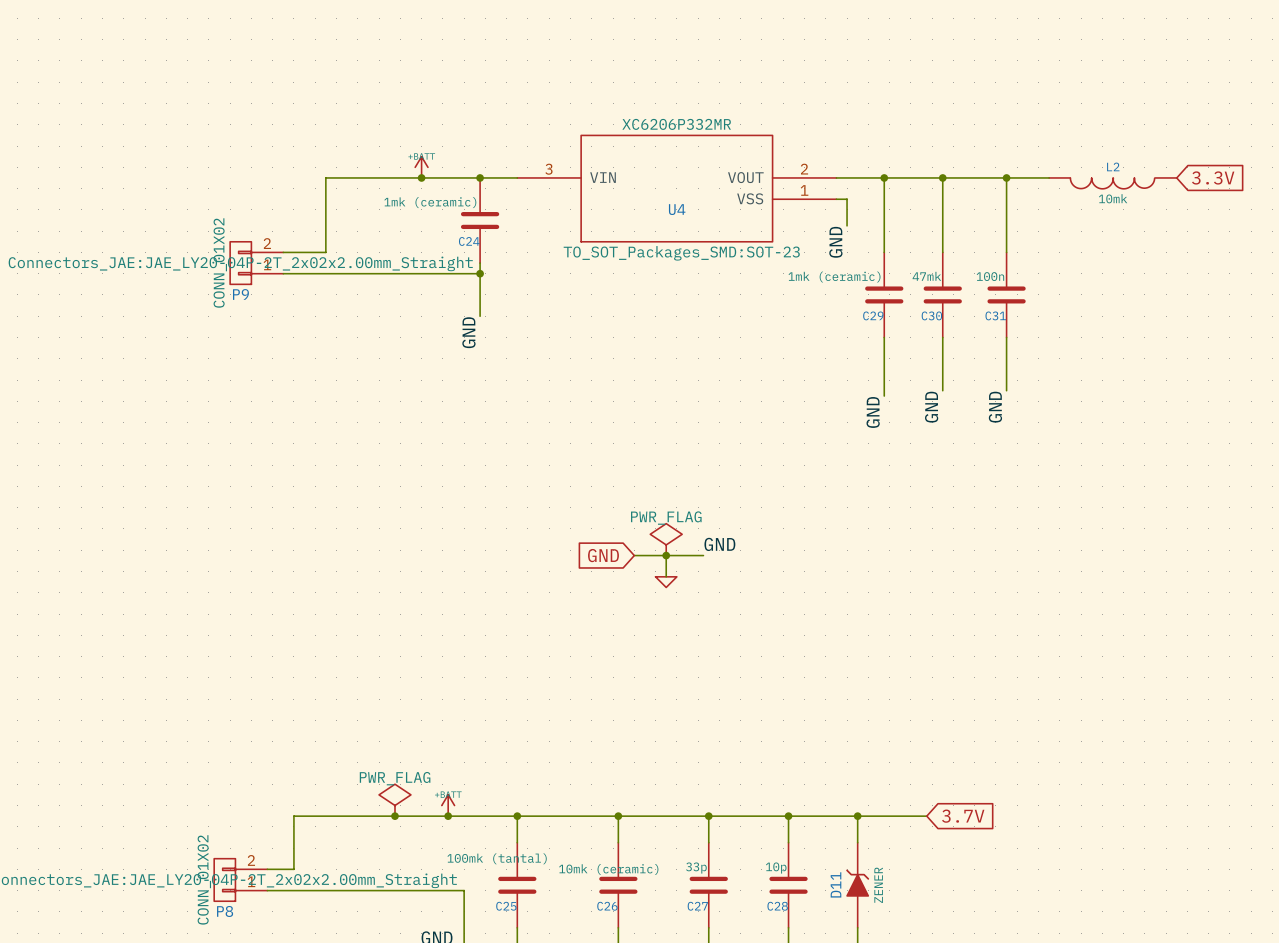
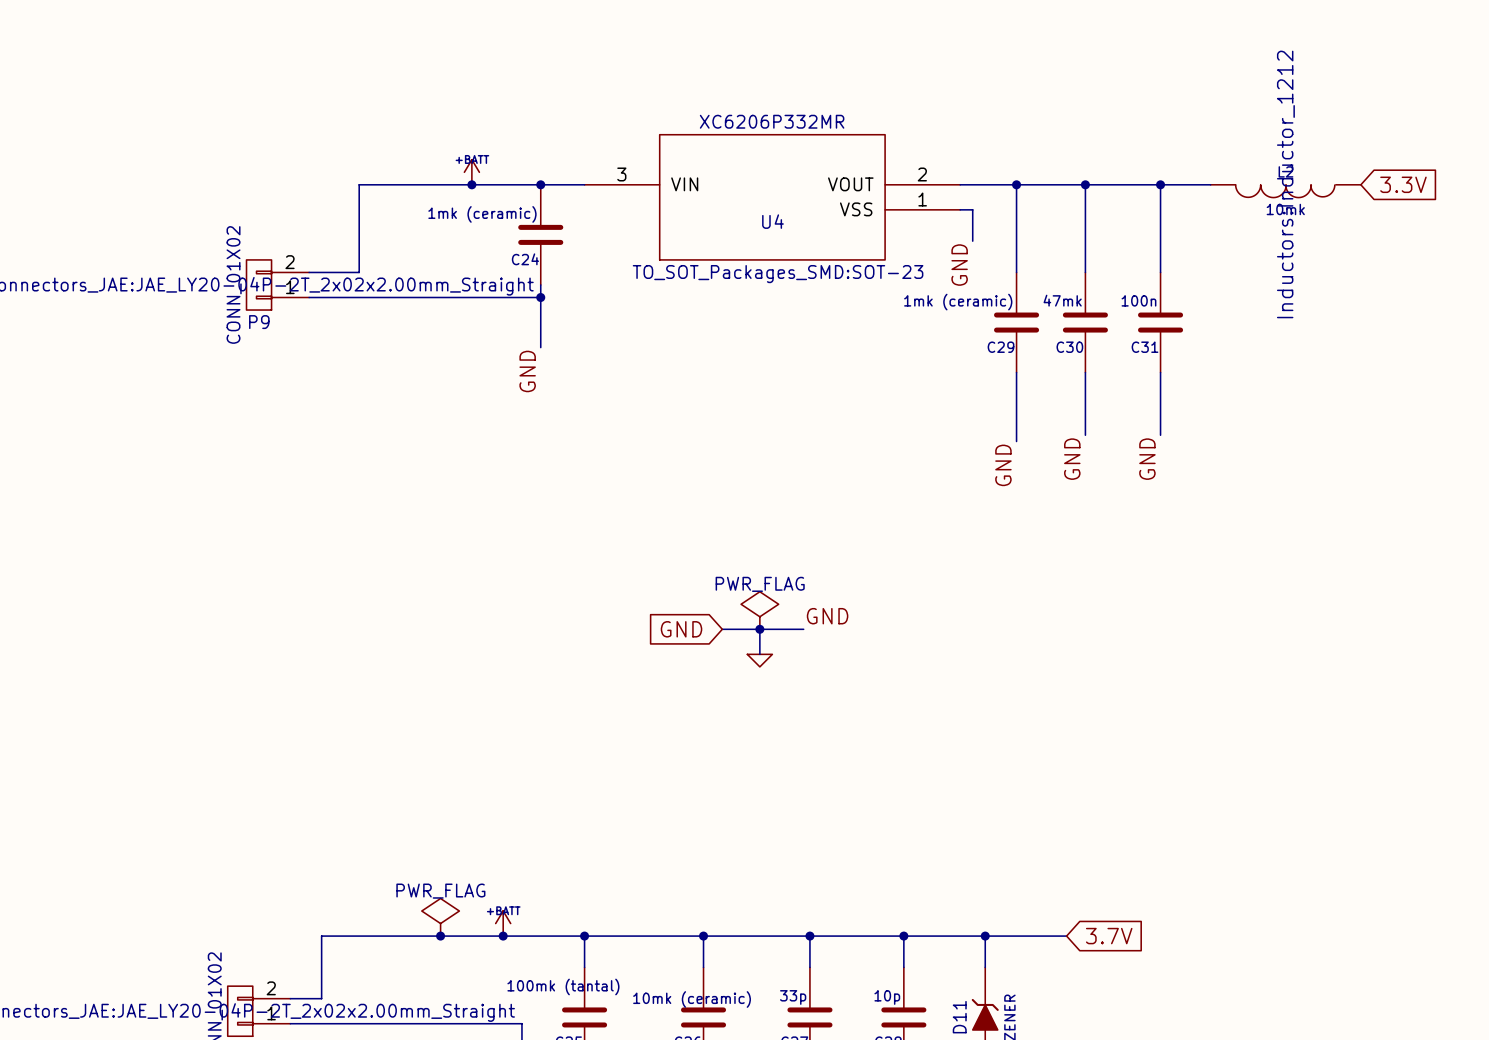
L2 text: none -> Inductors:Inductor_1212 (1285, 184)

